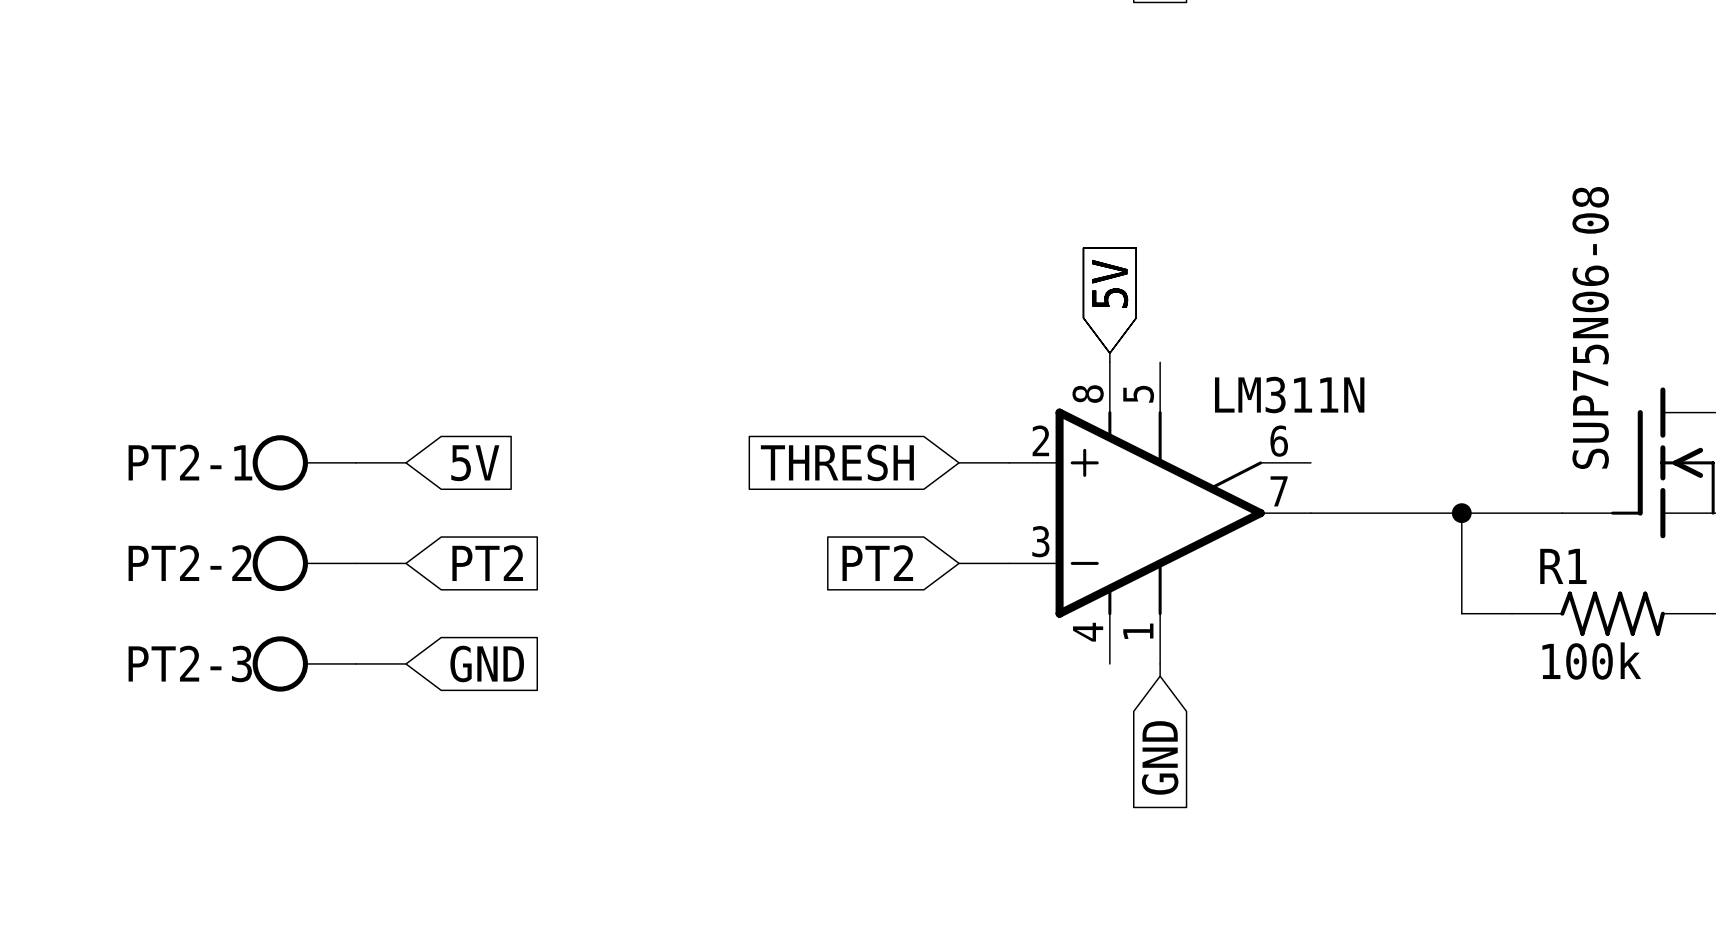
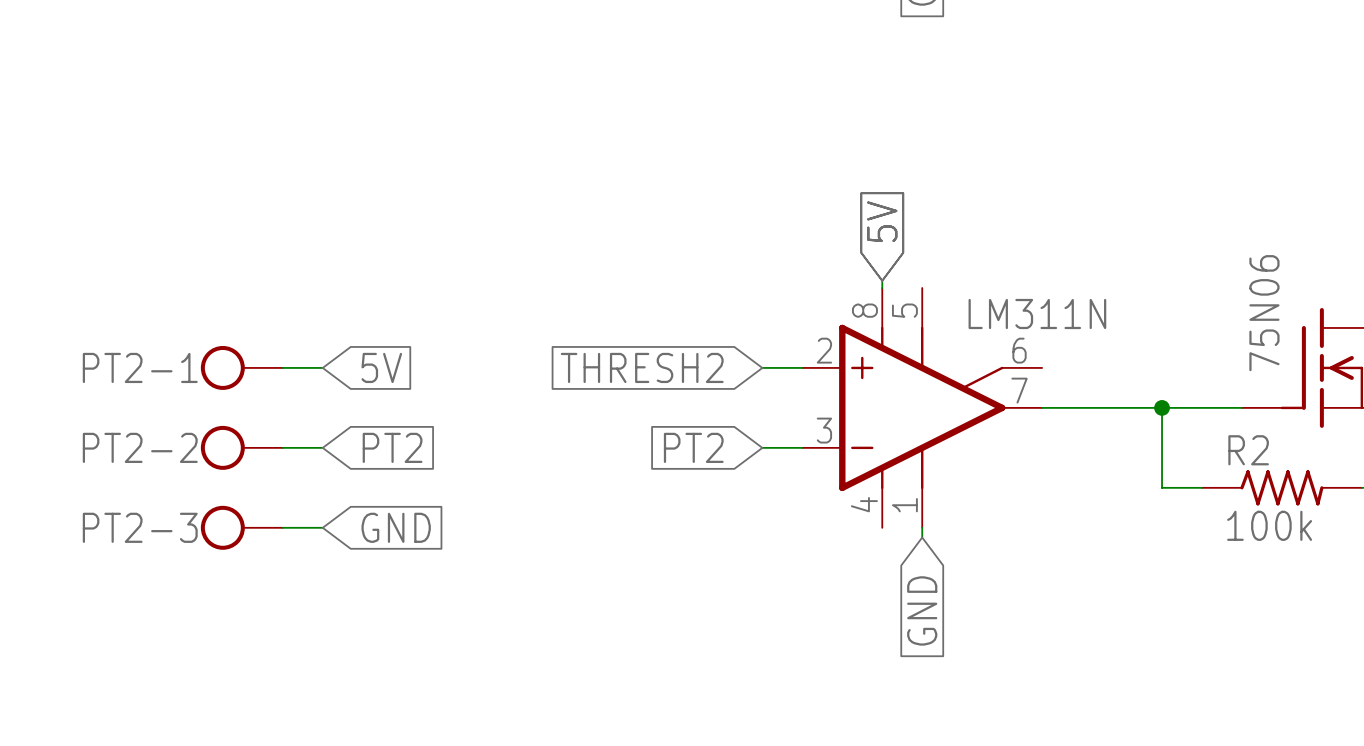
part value: SUP75N06-08 (1590, 328) -> 75N06 (1264, 313)
global label: THRESH (837, 462) -> THRESH2 (642, 367)
R1 name: R1 (1563, 566) -> R2 (1248, 450)

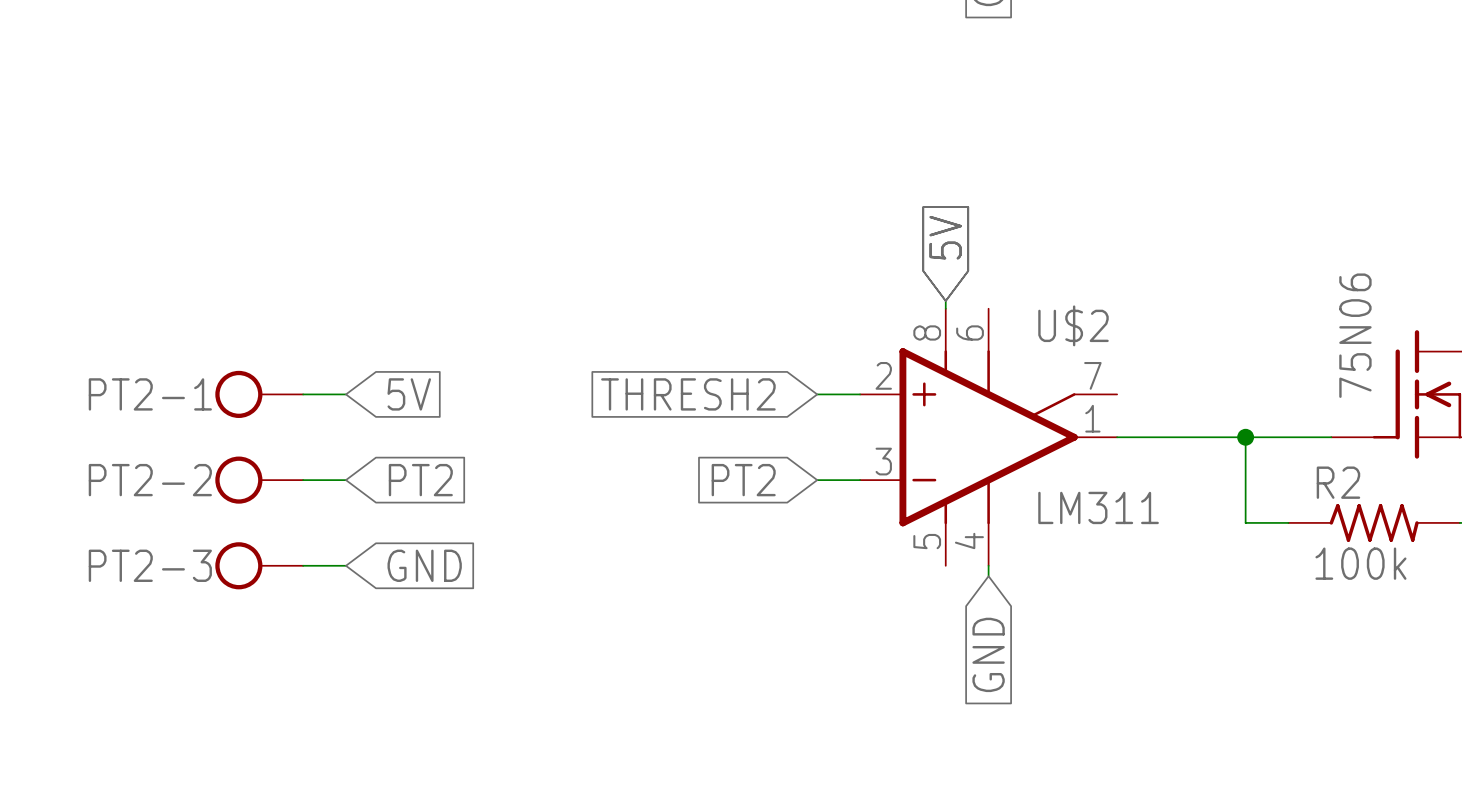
U$2 name: none -> U$2 (1073, 325)
U$2 pin number: 5 (904, 310) -> 6 (970, 332)
U$2 value: LM311N (1037, 313) -> LM311 (1098, 507)
U$2 pin number: 6 (1019, 350) -> 7 (1092, 375)
U$2 pin number: 7 (1019, 390) -> 1 (1092, 418)
U$2 pin number: 4 (864, 504) -> 5 (927, 541)
U$2 pin number: 1 (904, 505) -> 4 (969, 541)

